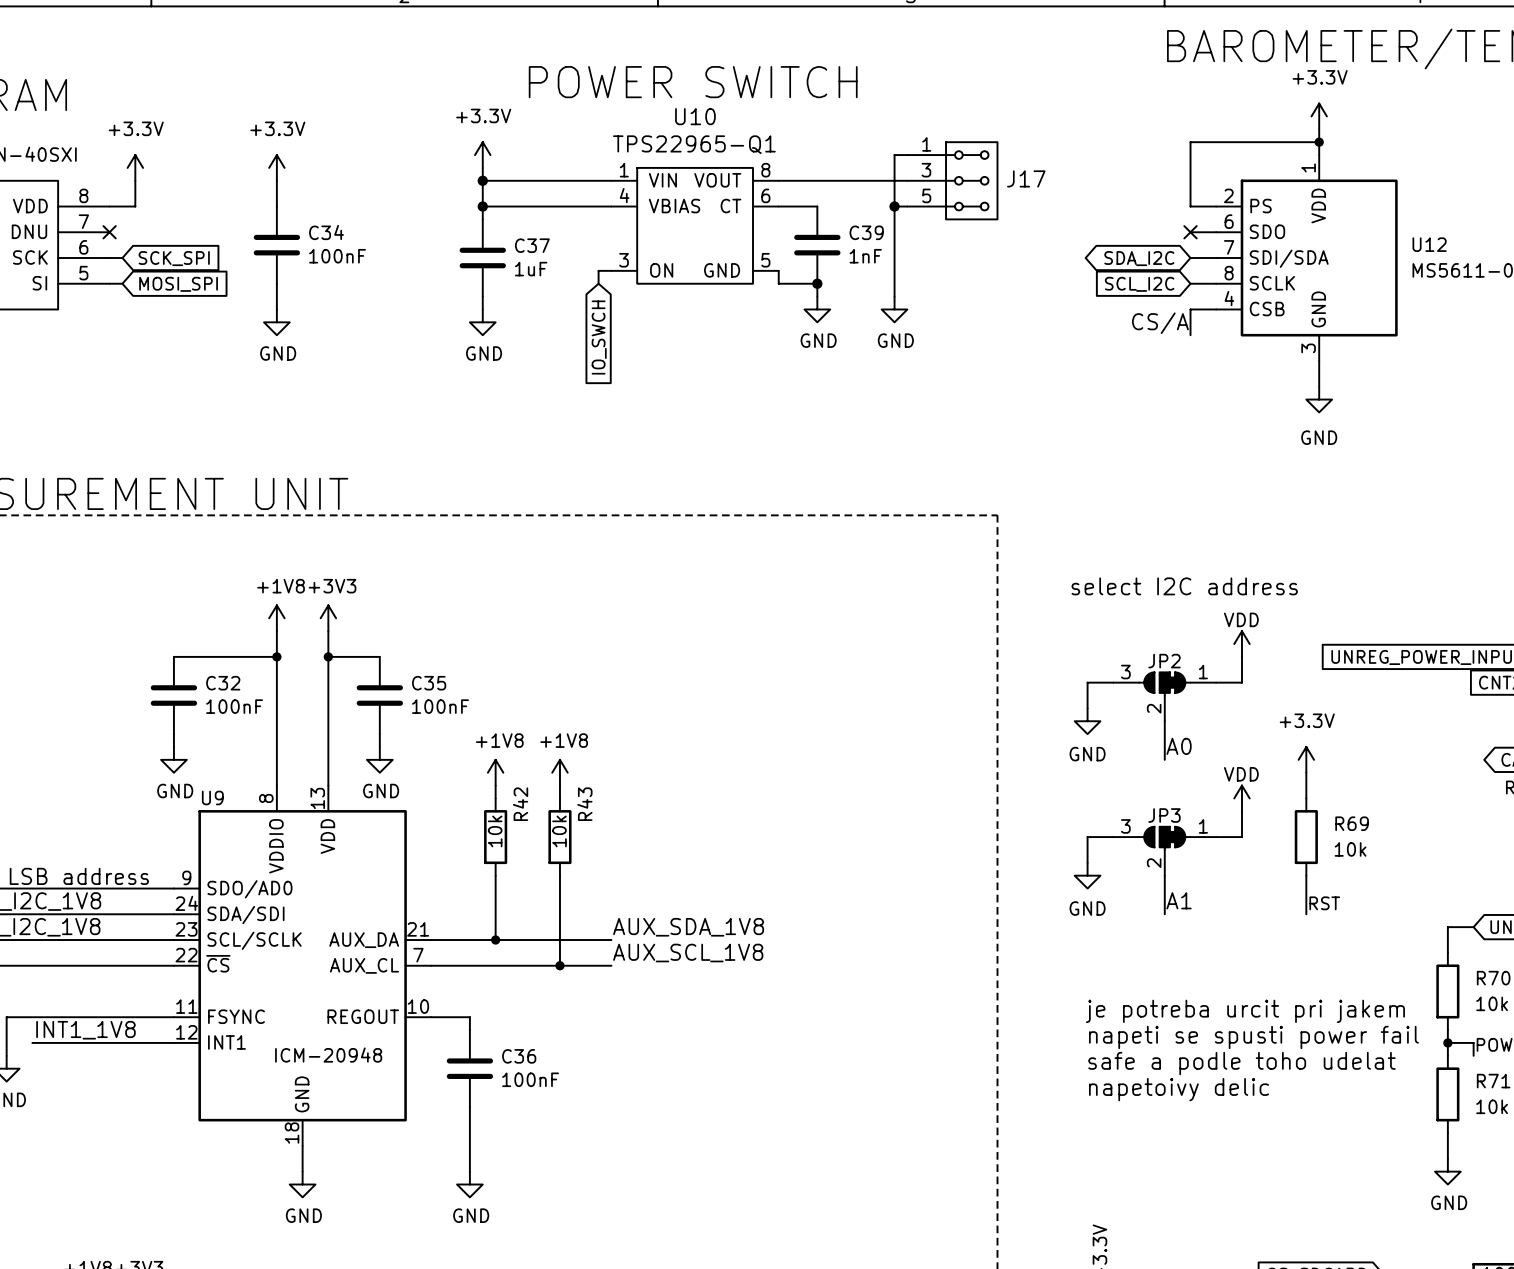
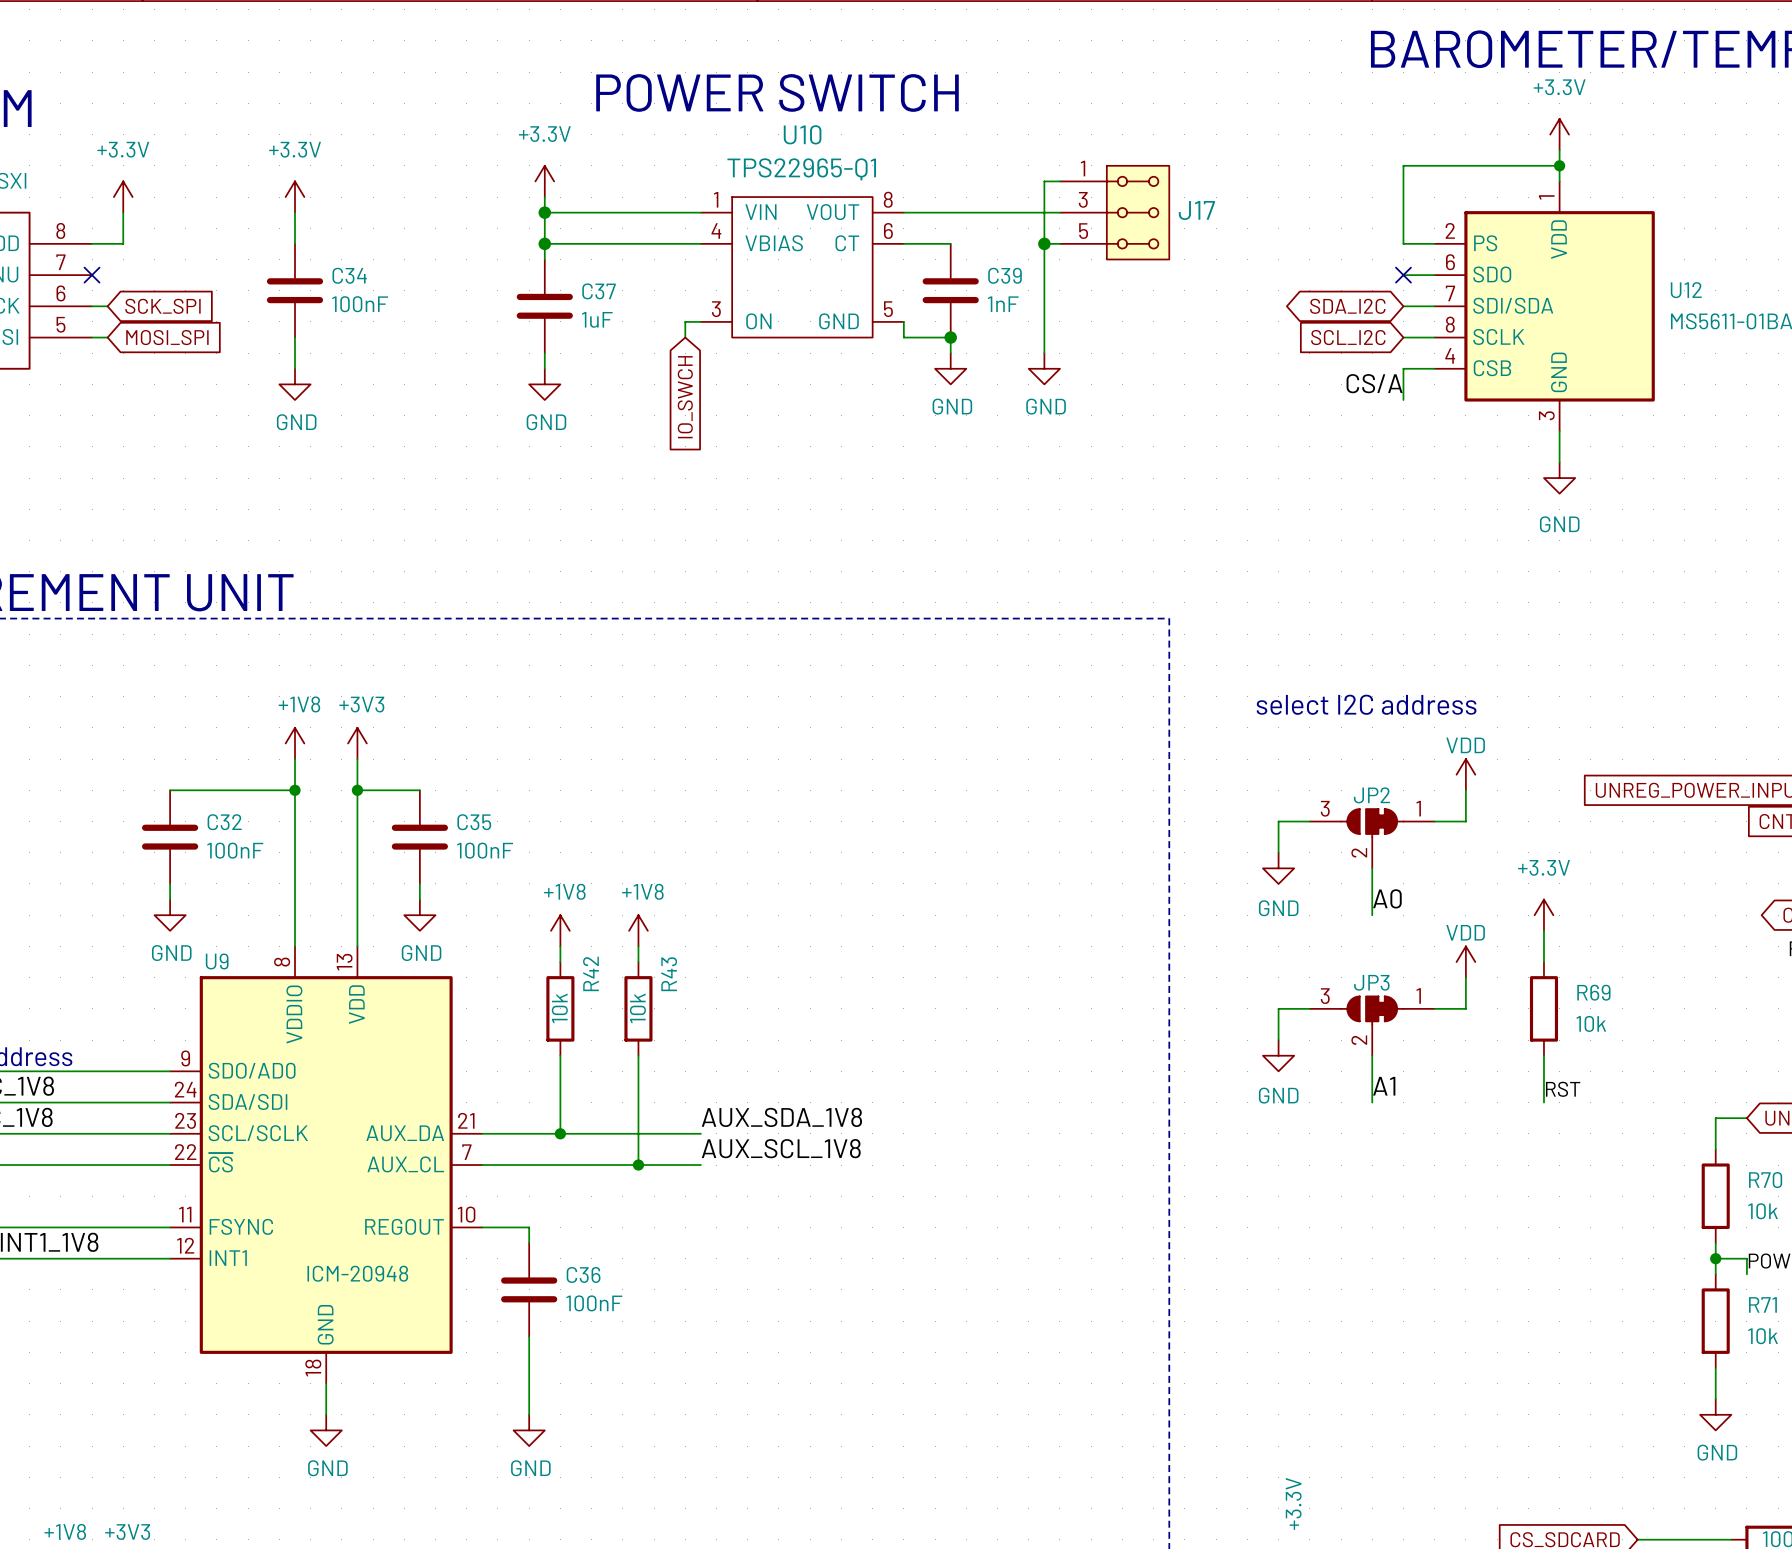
text: je potreba urcit pri jakem (1245, 1011) -> none
text: napeti se spusti power fail (1253, 1037) -> none
text: safe a podle toho udelat (1241, 1063) -> none
text: napetoivy delic (1179, 1089) -> none

